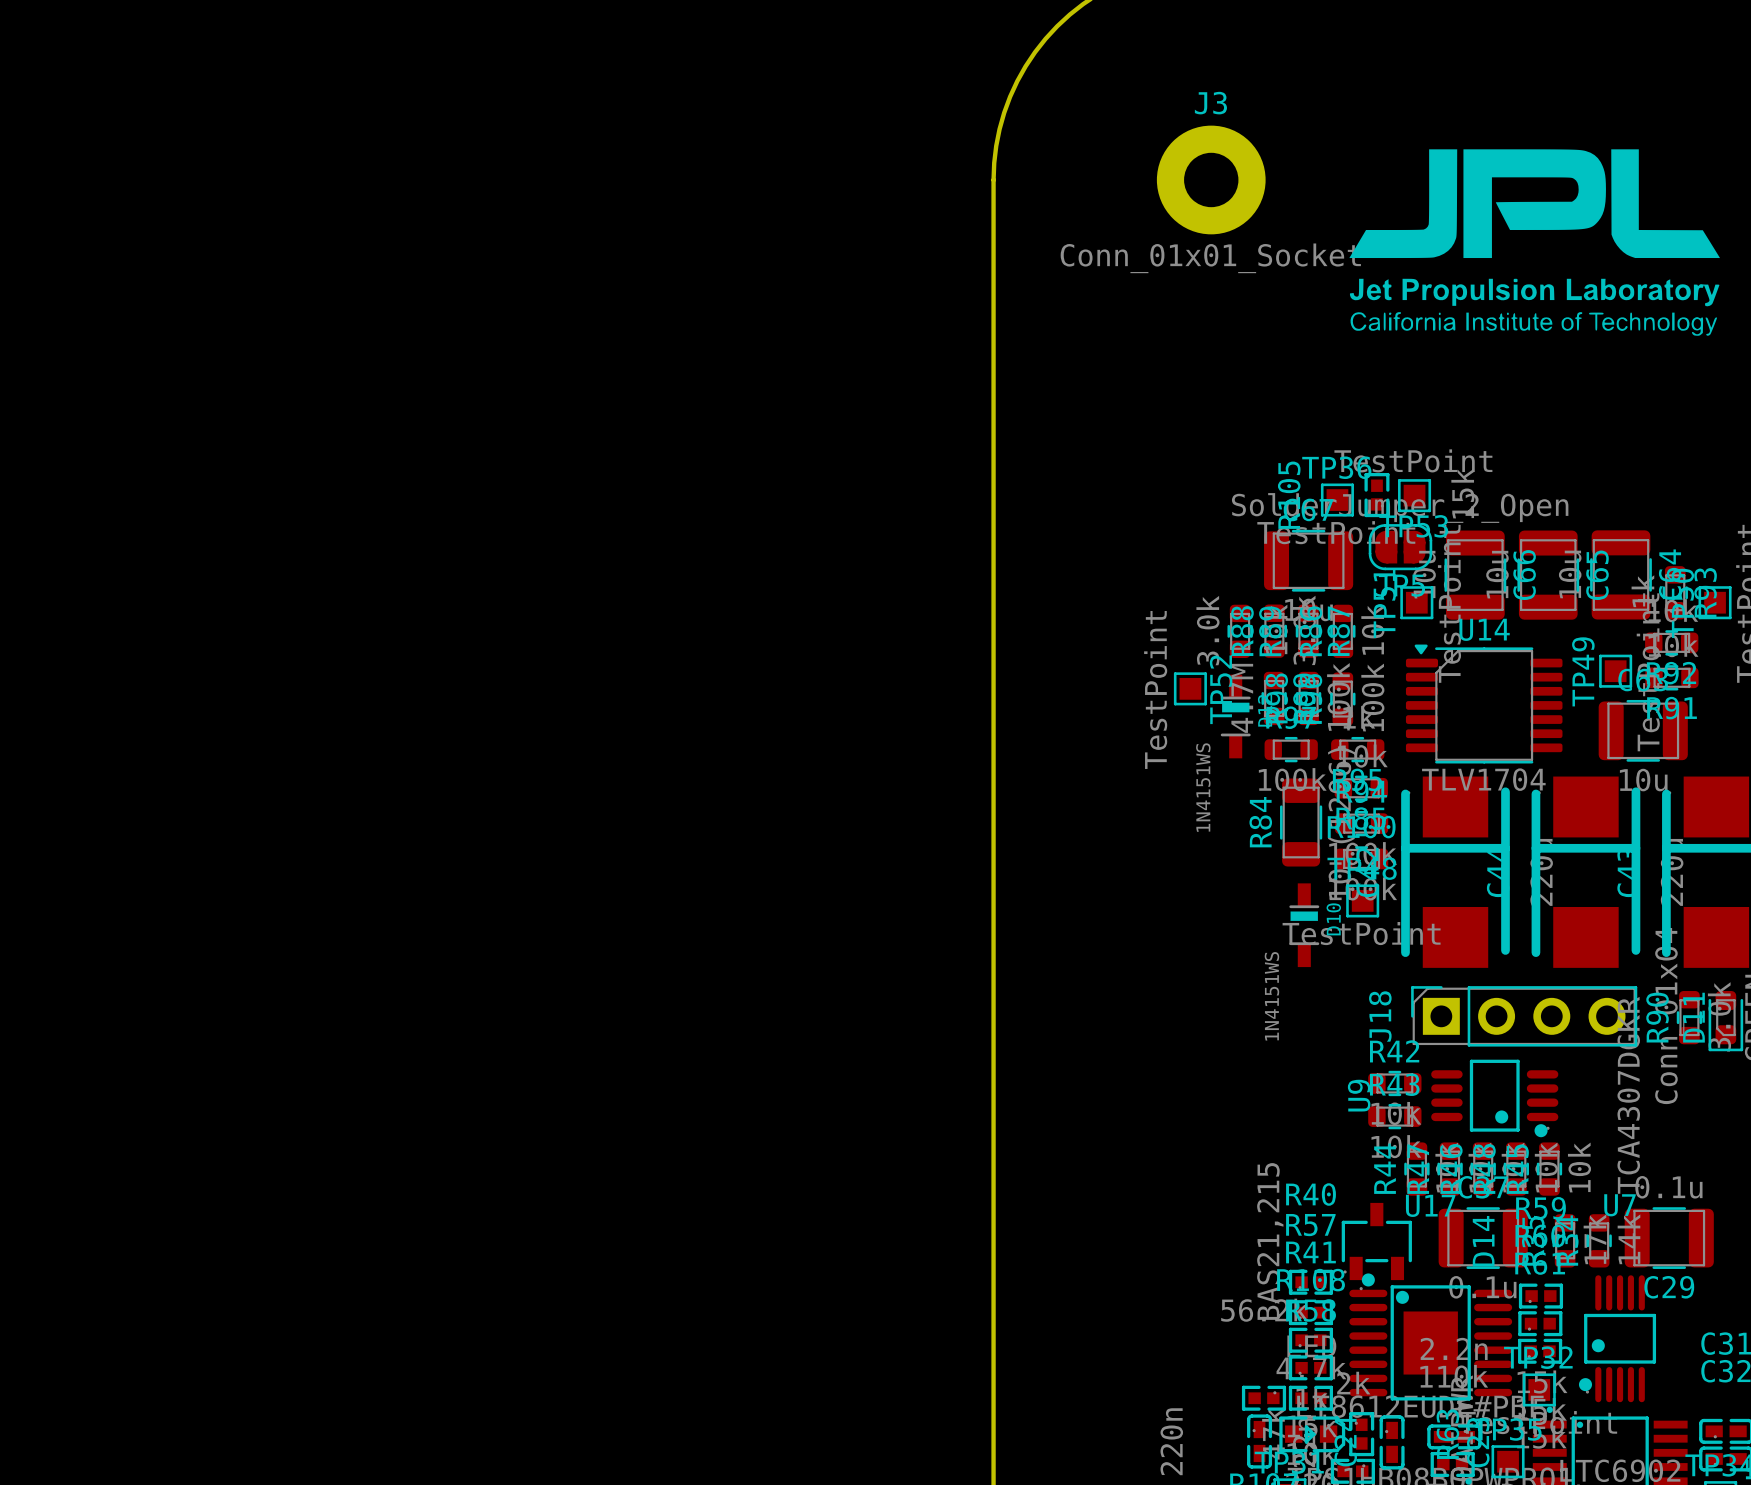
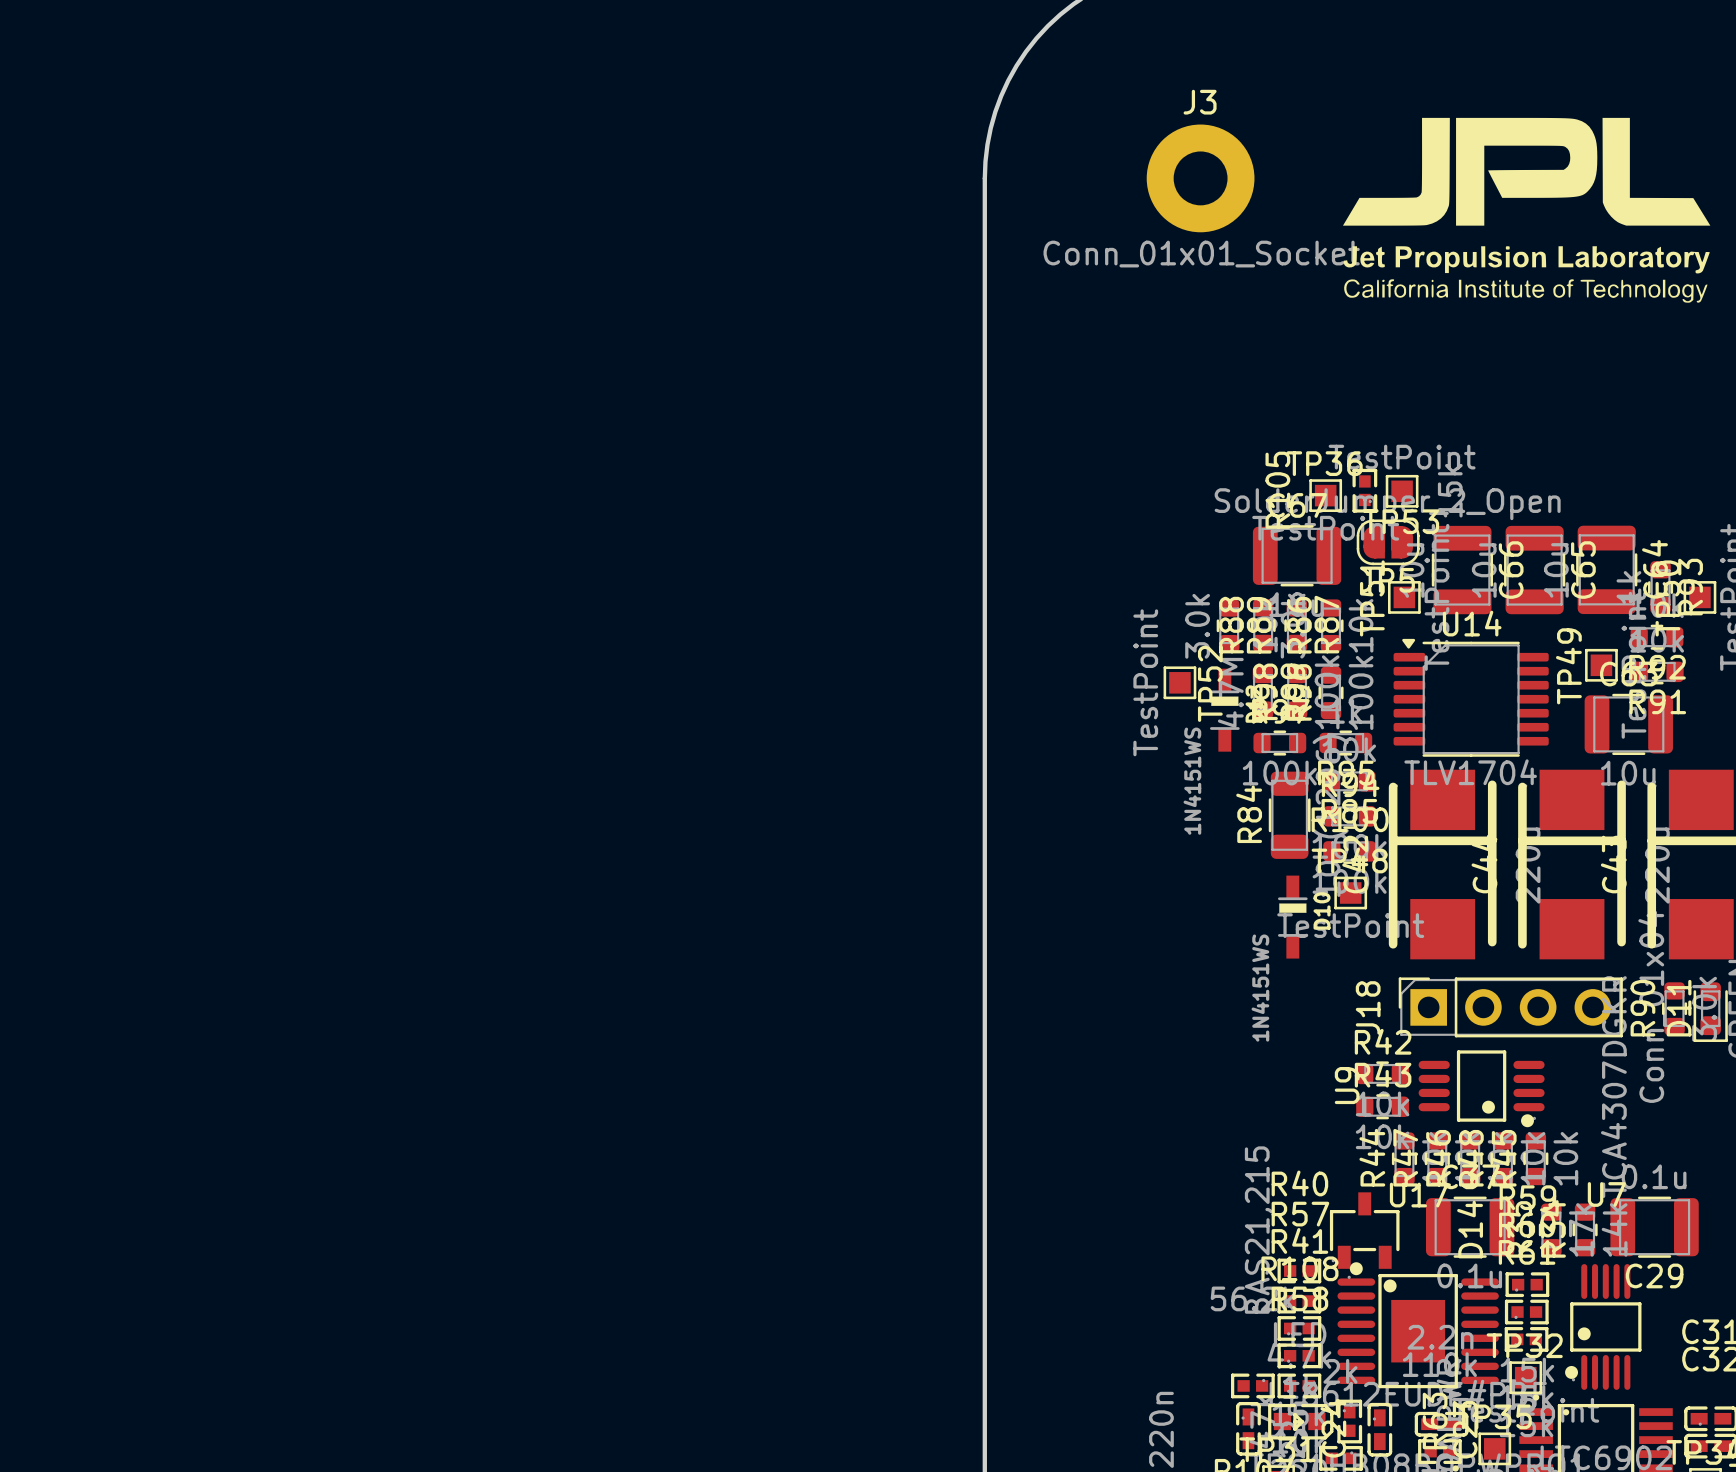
drawing position: (1534, 242) -> (1526, 210)

